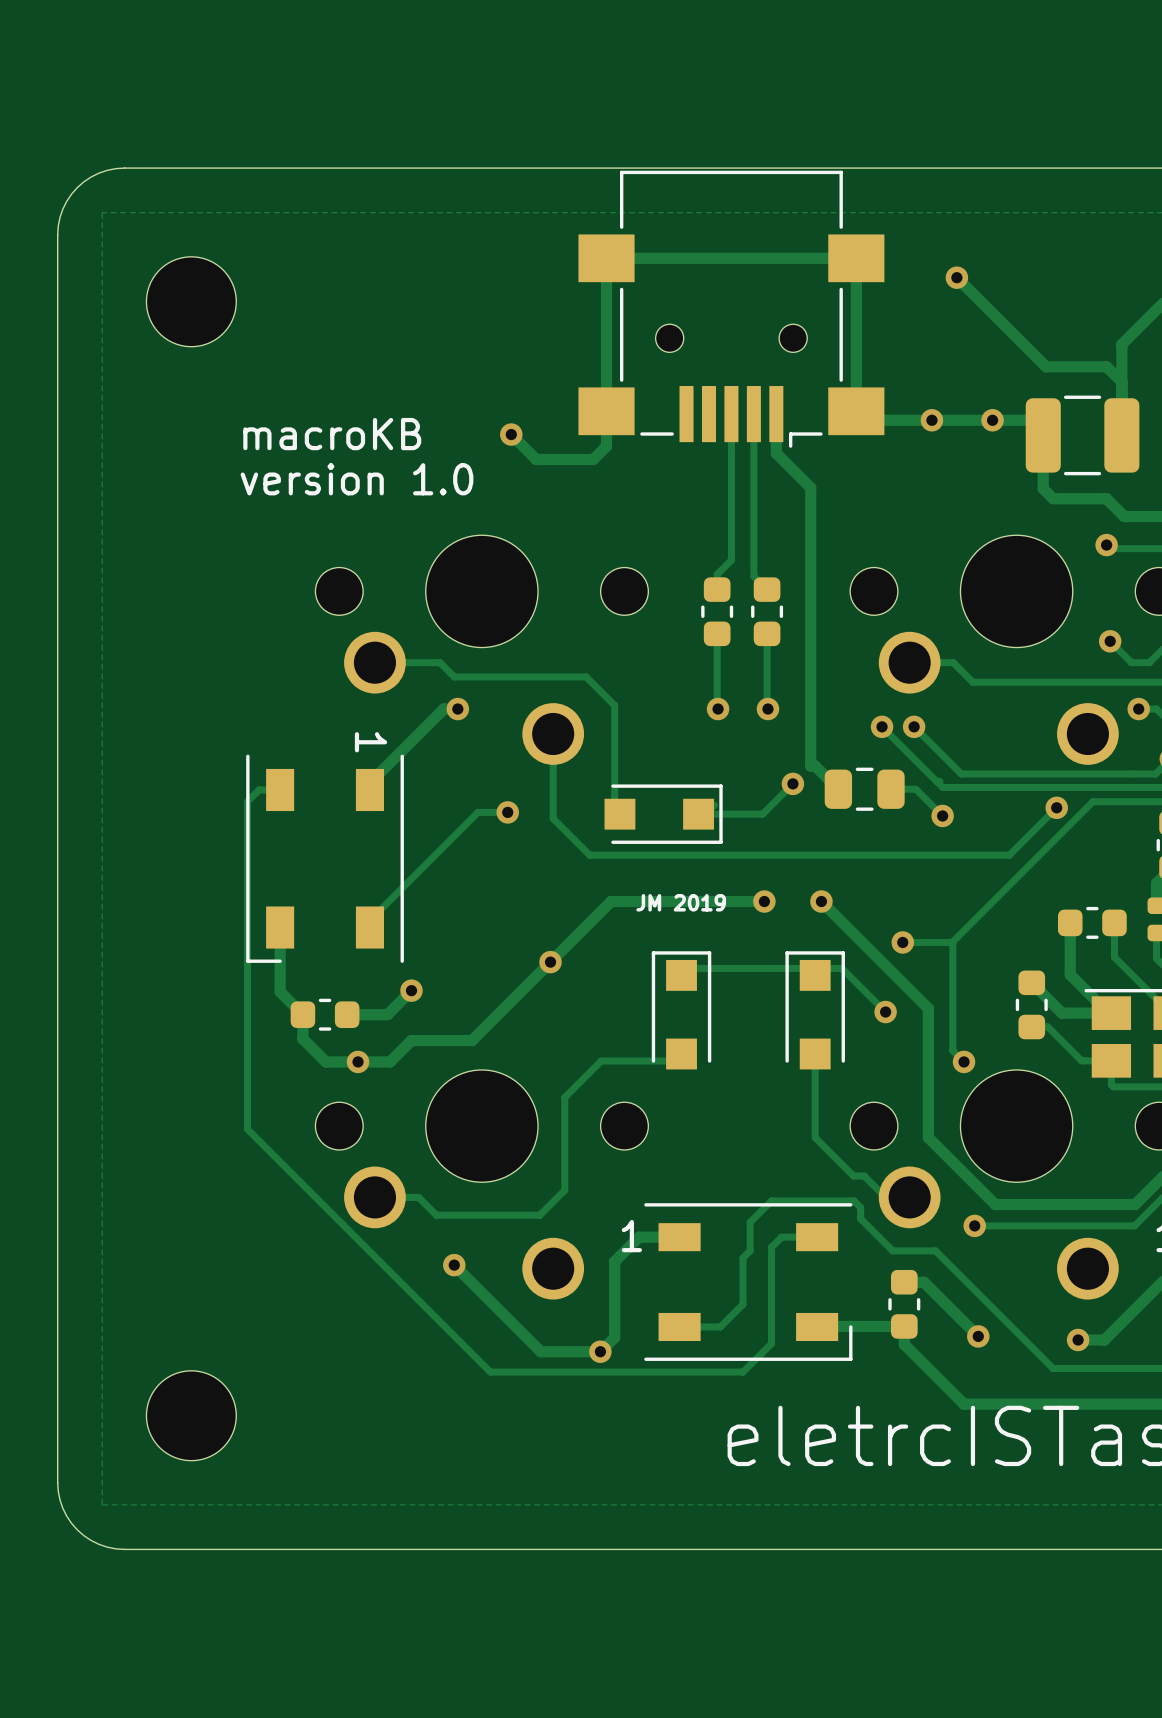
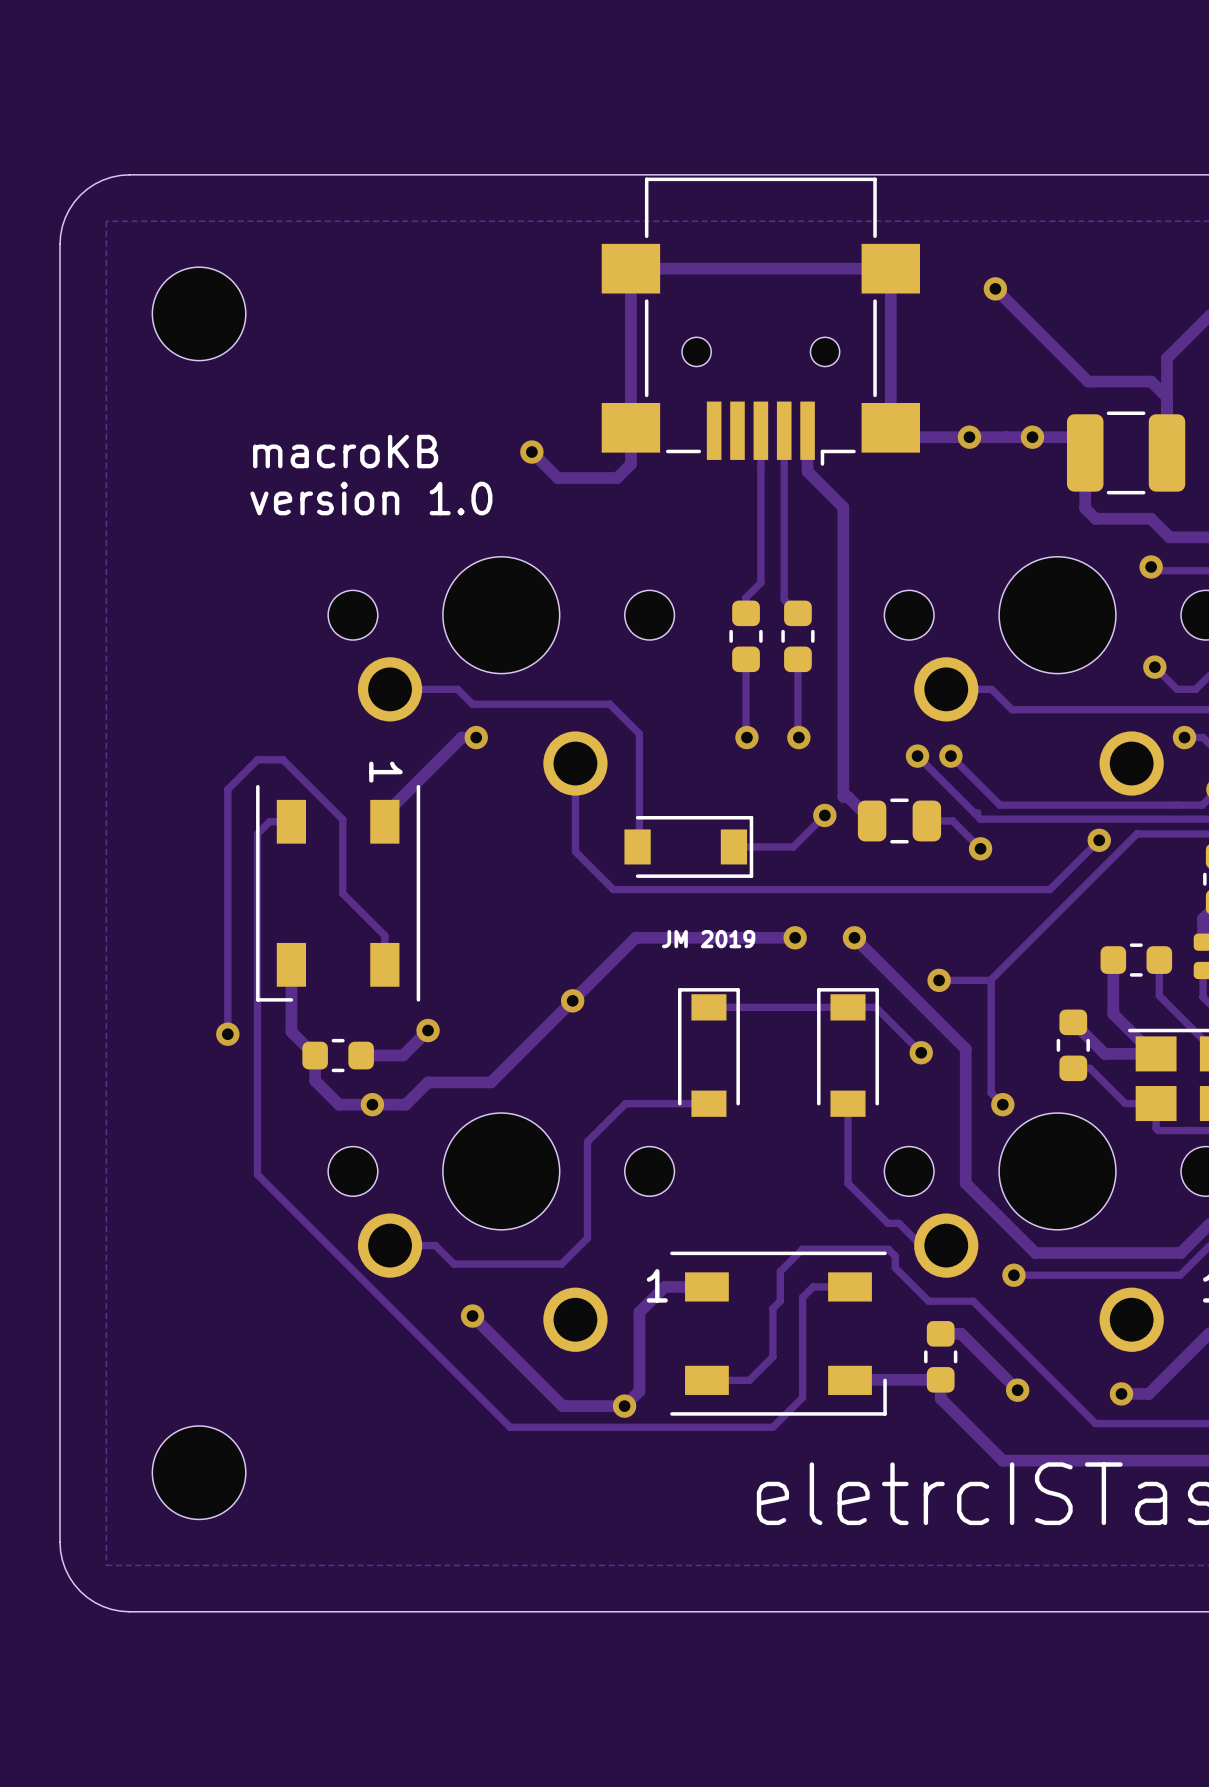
part footprint: [604, 784, 723, 844] -> [624, 816, 754, 878]
track: (507, 812) (478, 812) (369, 920) -> (227, 1034) (227, 789) (257, 759) (283, 759) (342, 819) (342, 893) (384, 935) (384, 957)
via: (507, 812) -> none
part footprint: [651, 951, 712, 1070] -> [677, 988, 740, 1117]
part footprint: [785, 951, 845, 1070] -> [817, 988, 879, 1117]
via: none -> (227, 1034)

